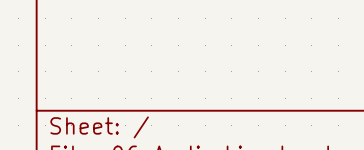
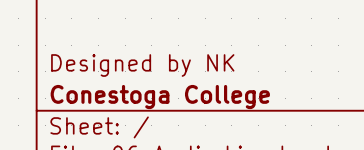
title block: none -> Designed by NK (142, 65)
title block: none -> Conestoga College (160, 97)

